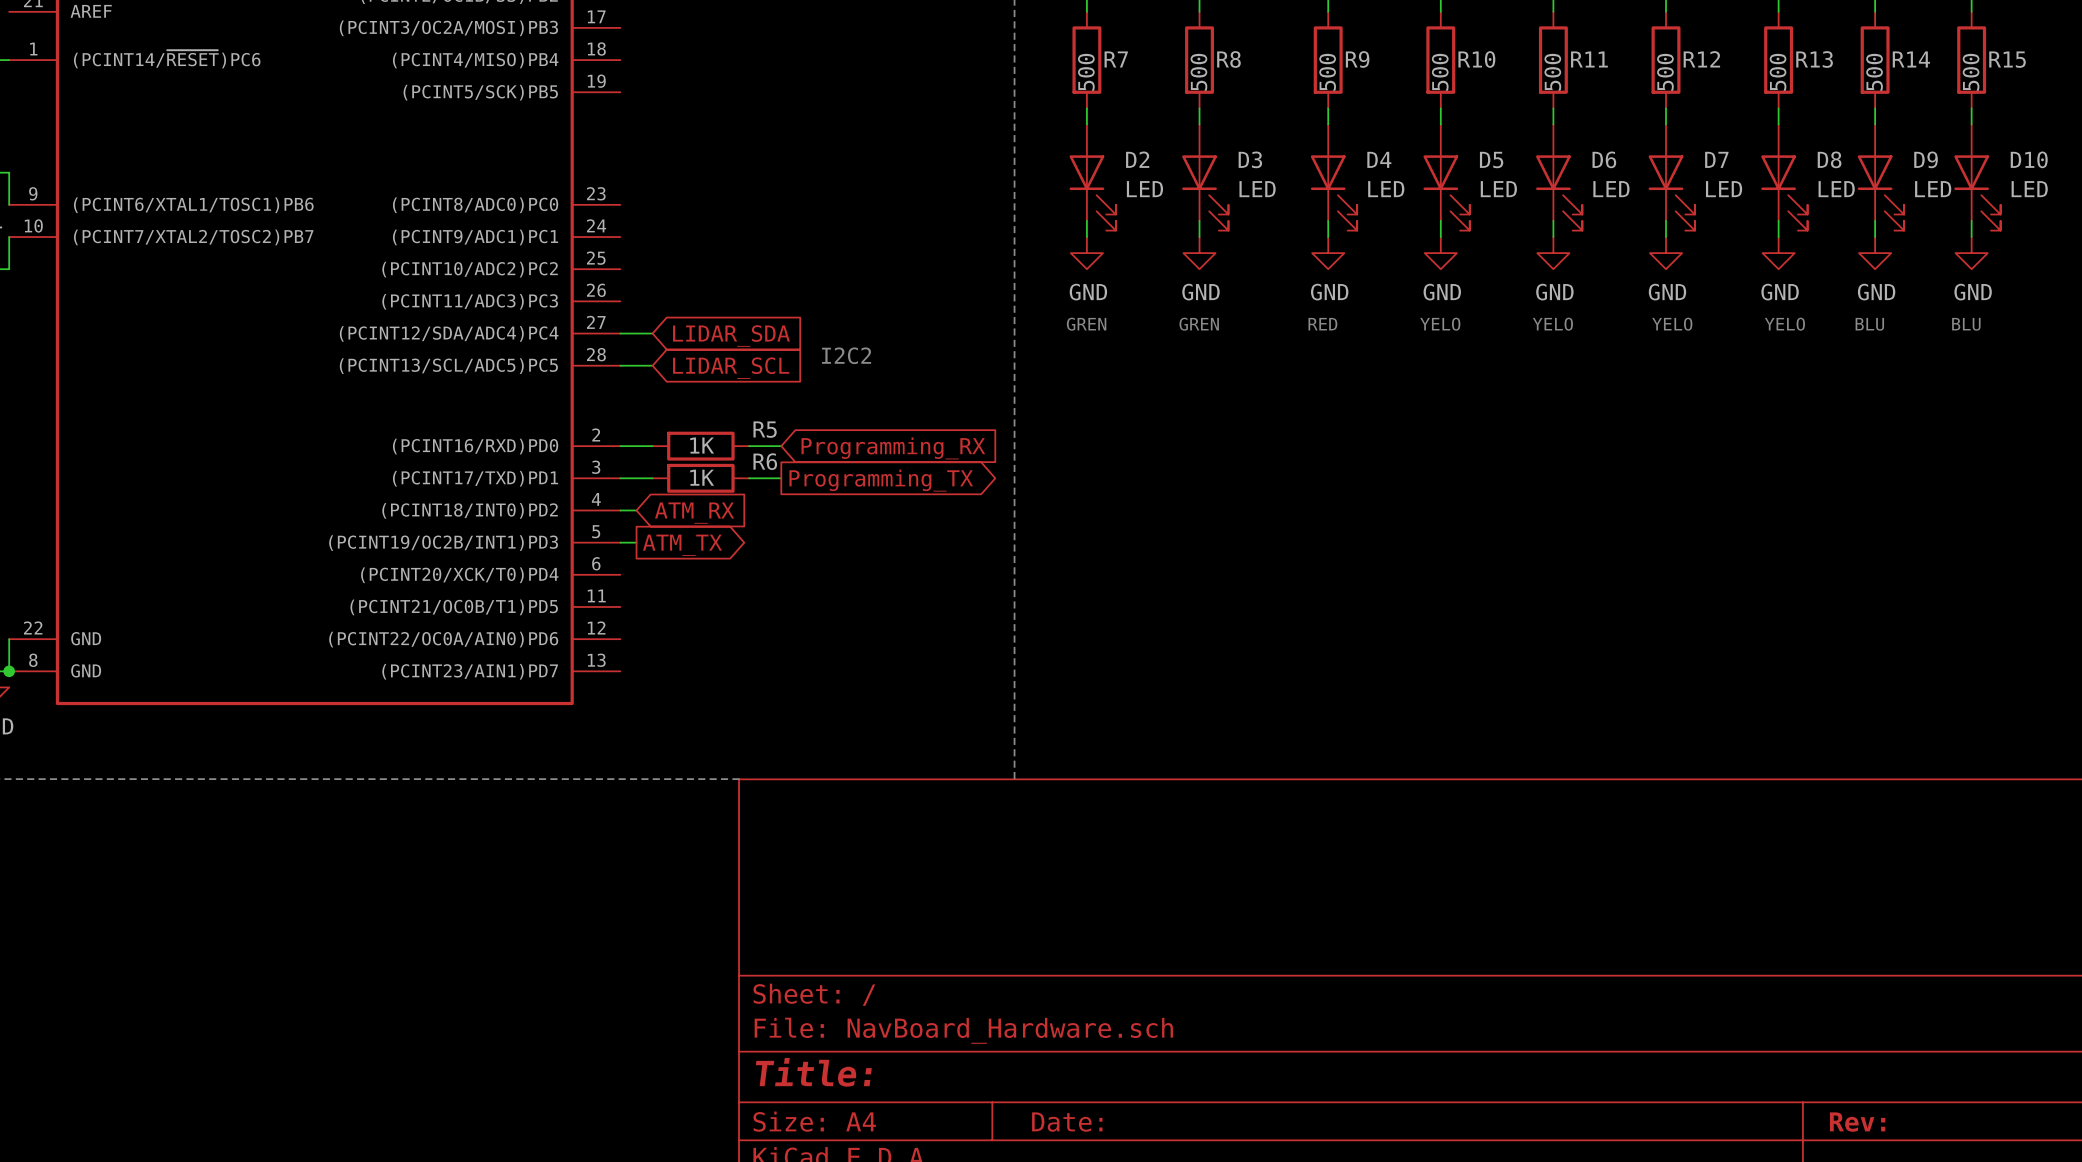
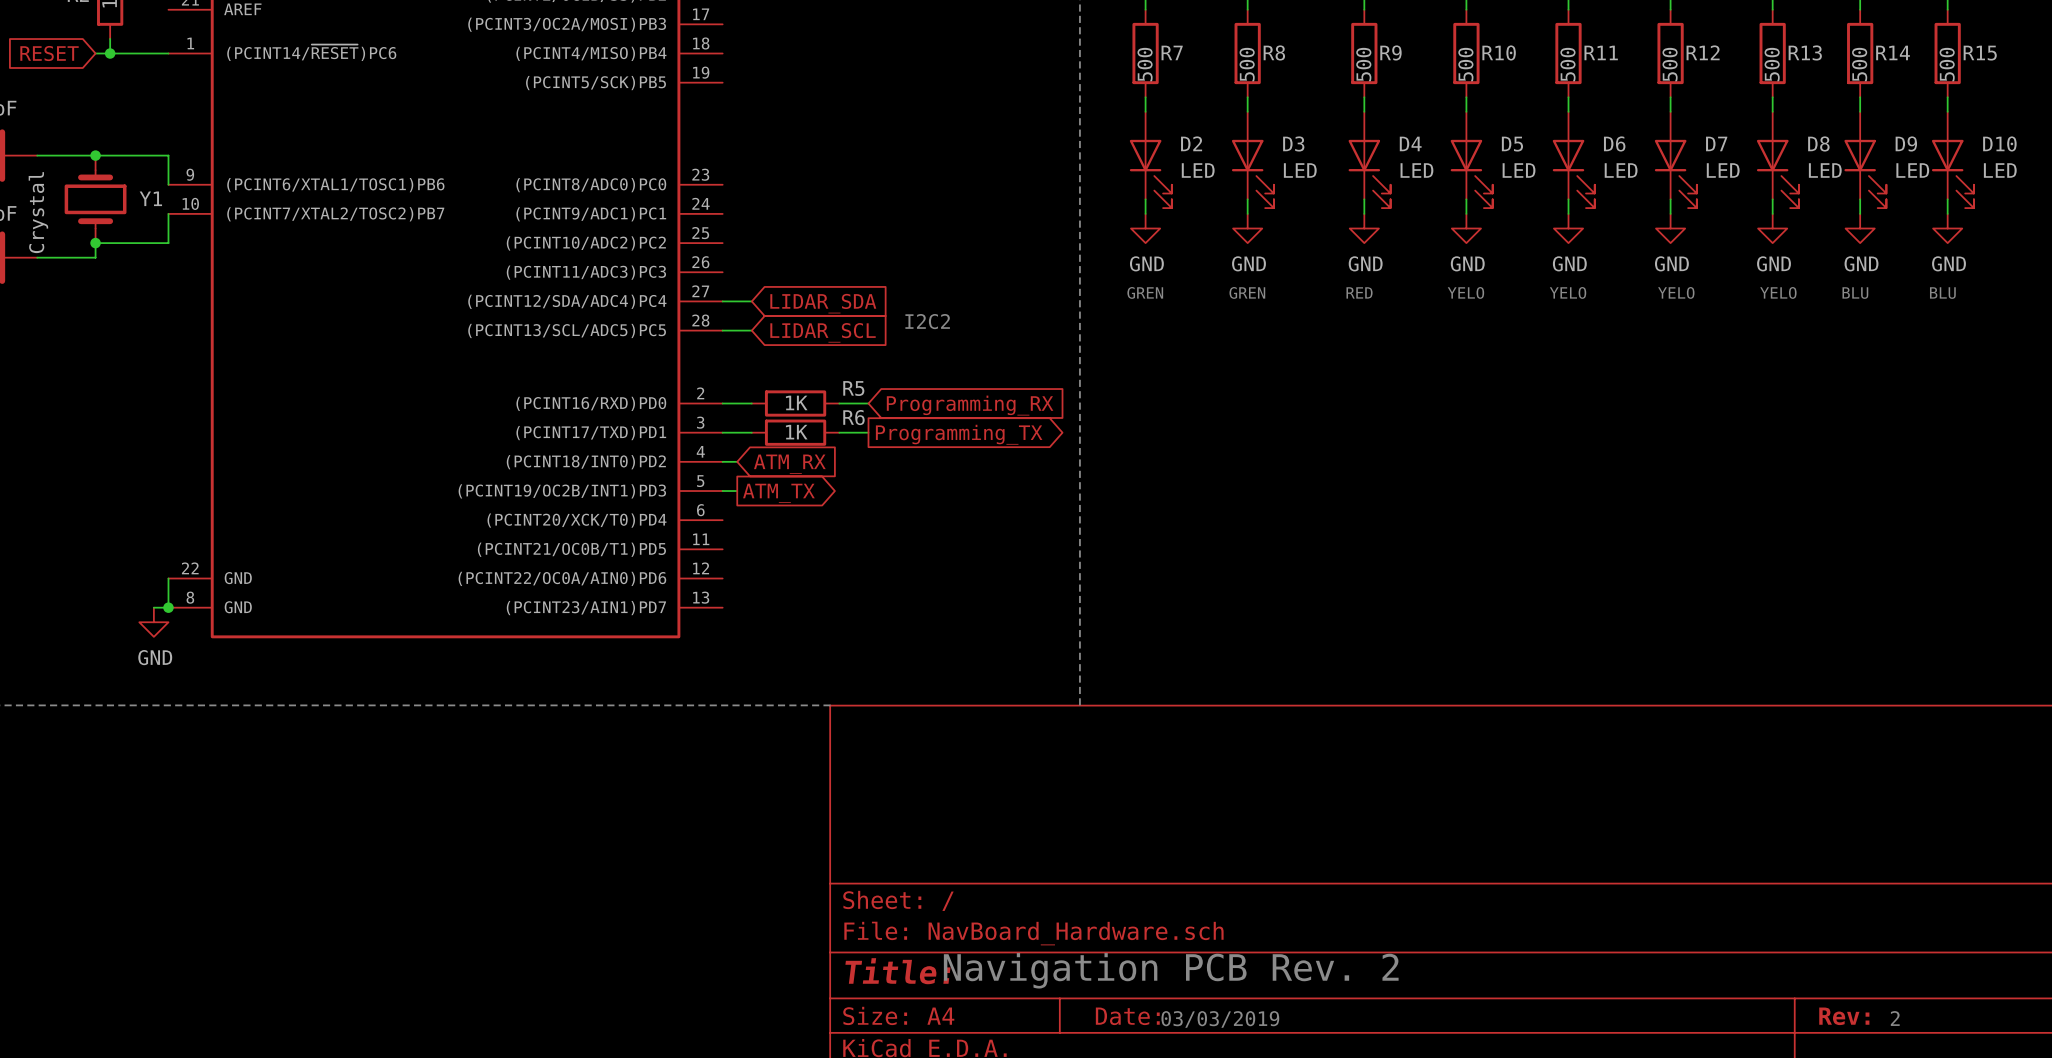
text: none -> Navigation PCB Rev. 2 (1171, 970)
text: none -> 2 (1895, 1018)
text: none -> 03/03/2019 (1220, 1019)

